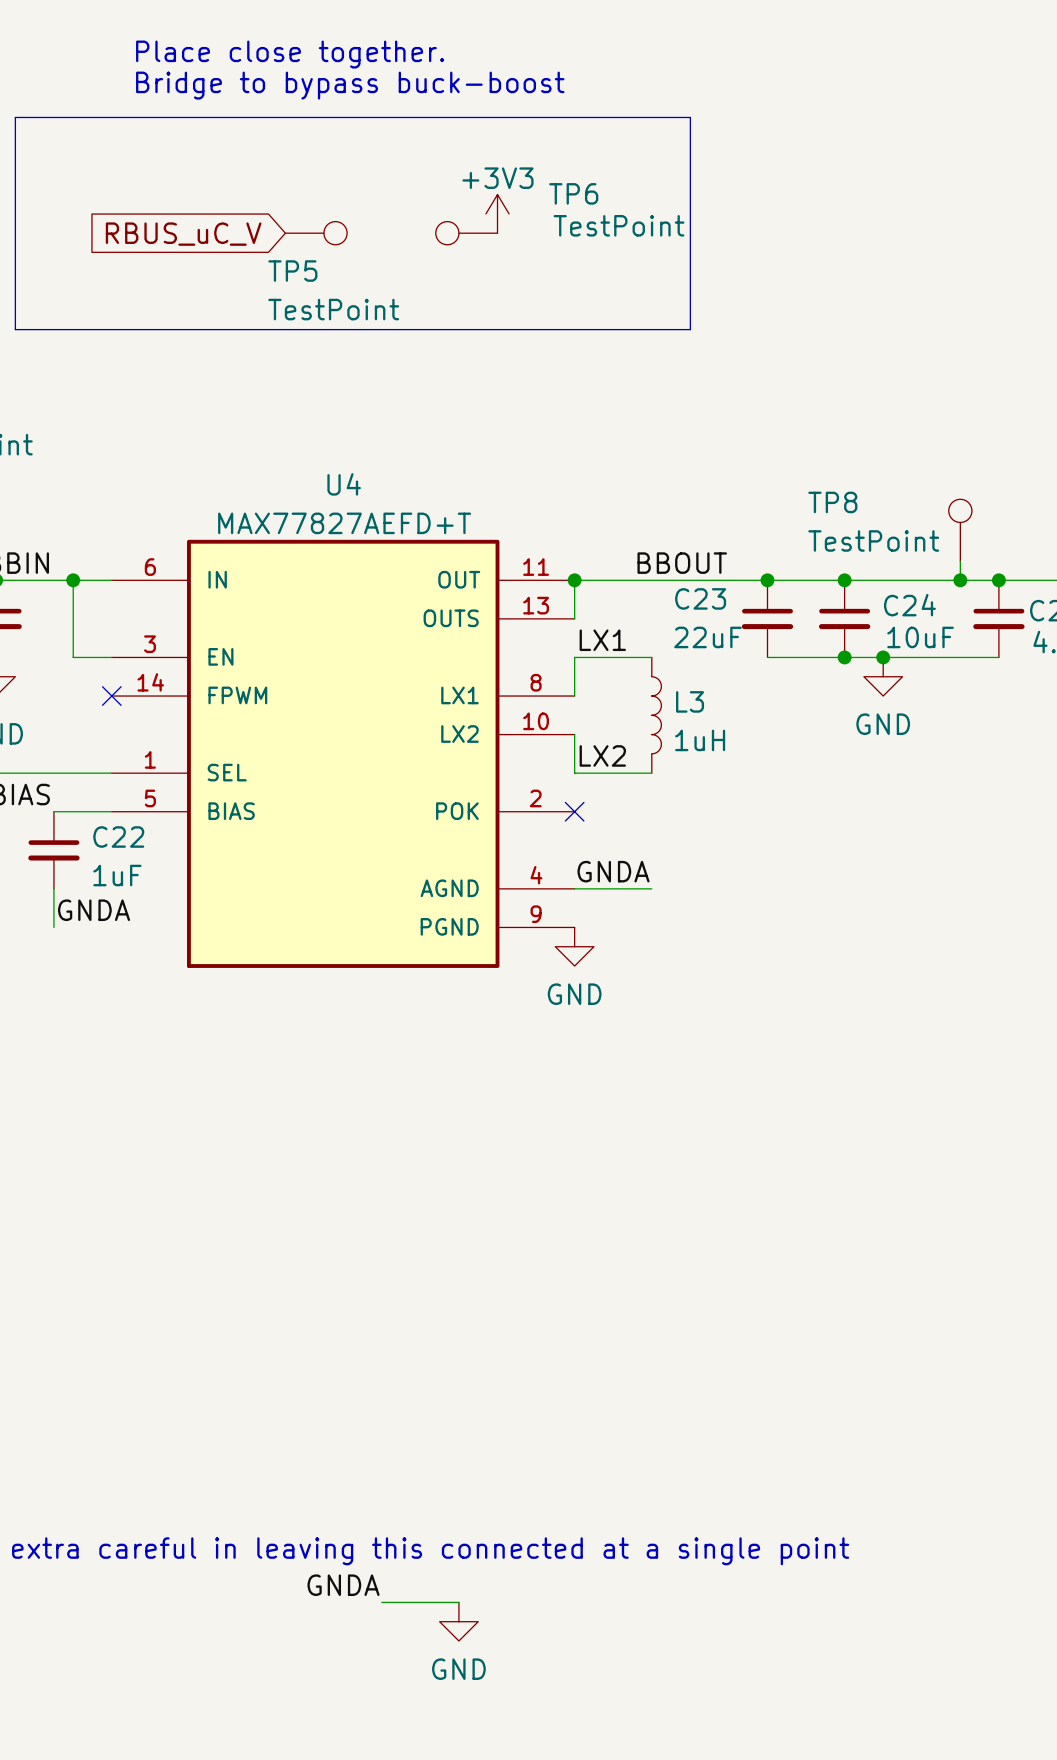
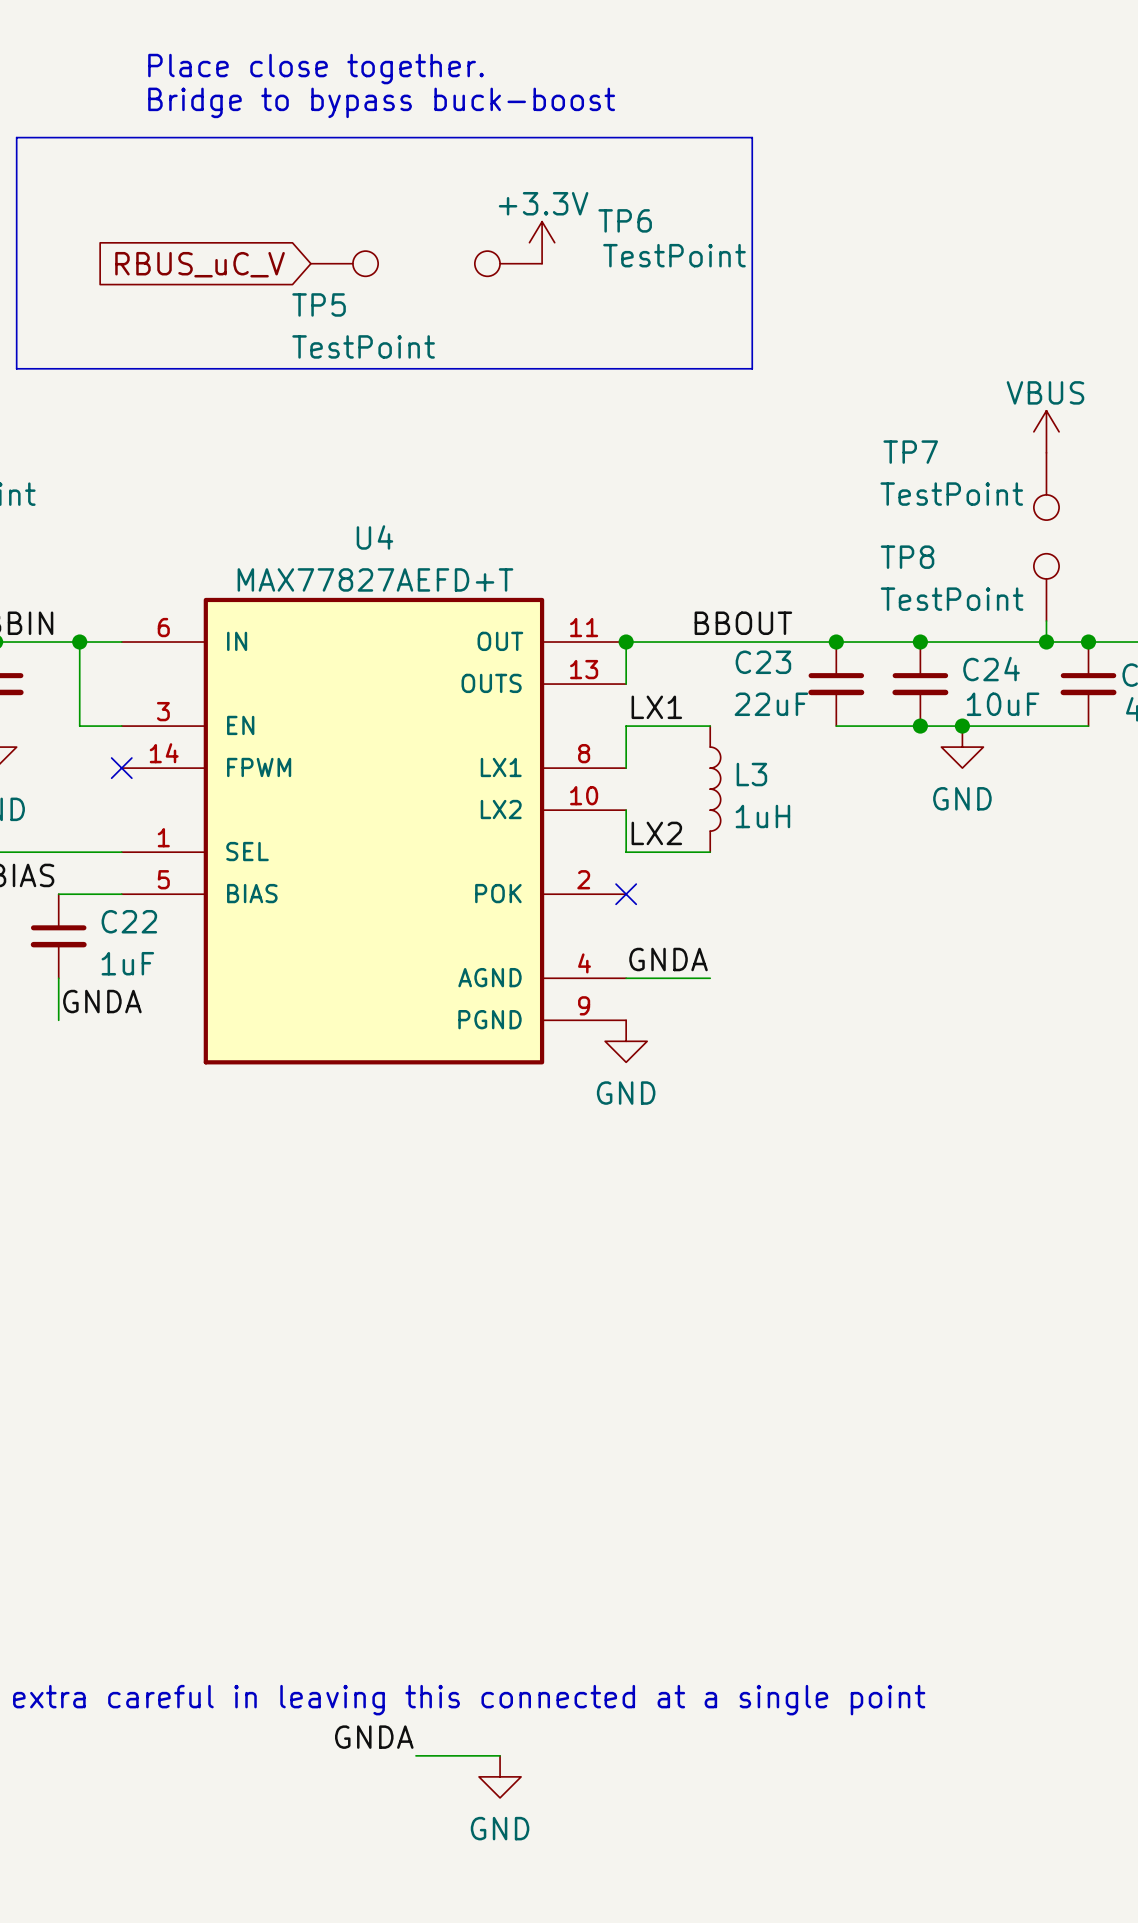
power symbol: +3V3 (497, 213) -> +3.3V (542, 242)
power symbol: none -> VBUS (1046, 431)
TP7: none -> TestPoint (1046, 486)

